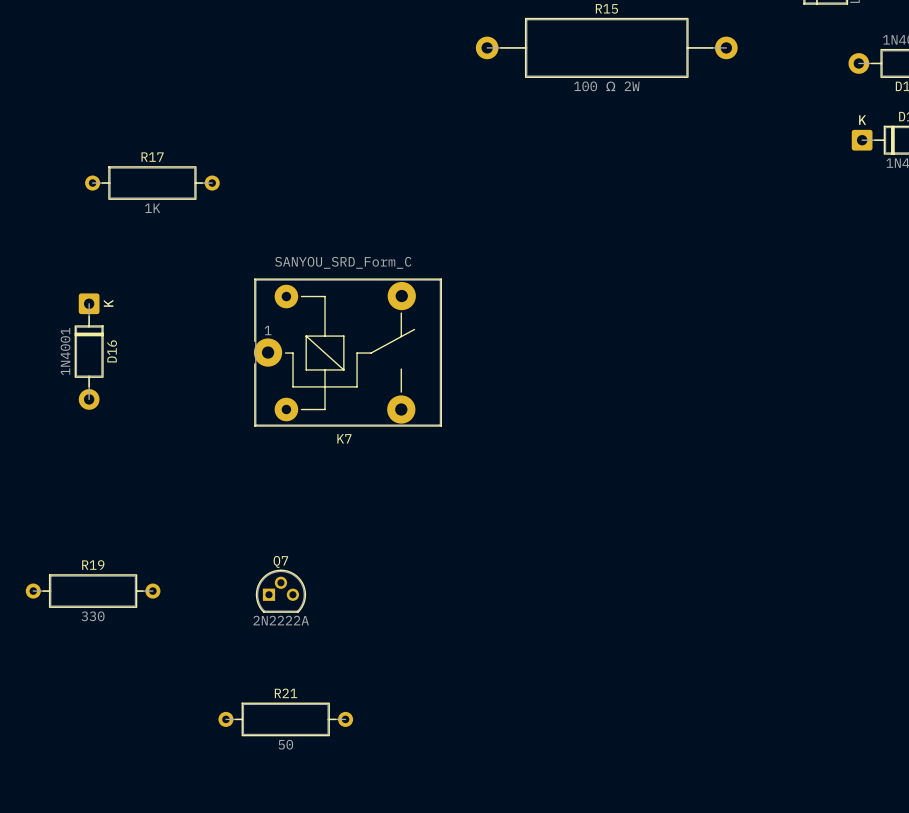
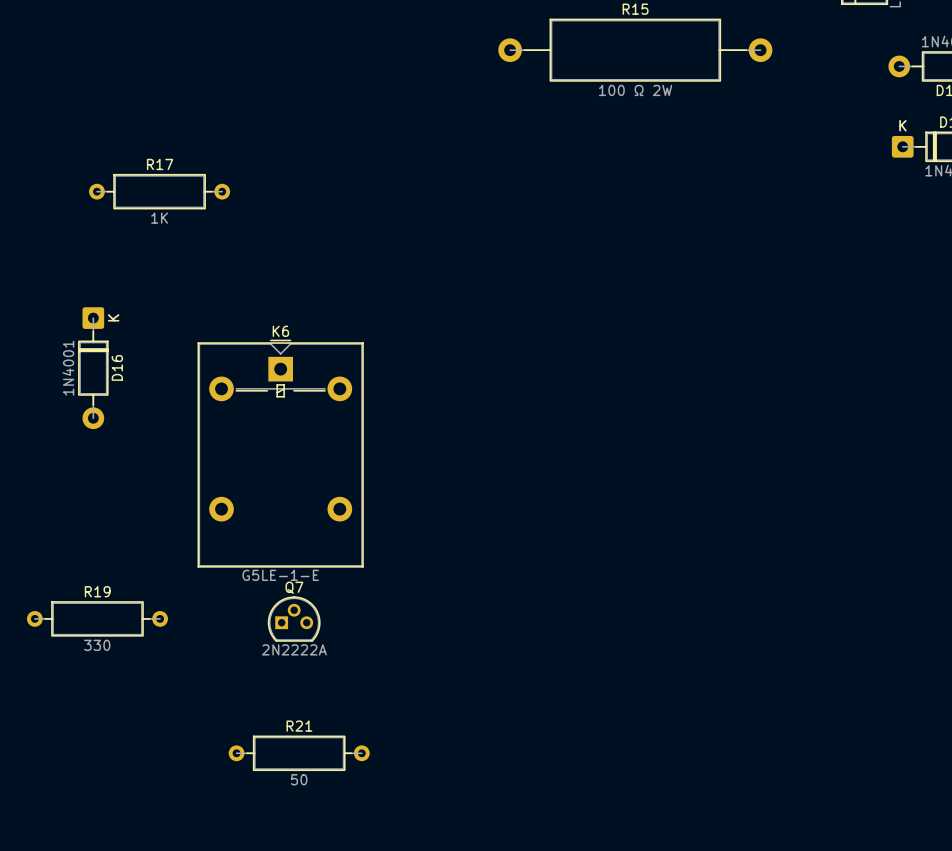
K7: SANYOU_SRD_Form_C (347, 352) -> none
K6: none -> G5LE-1-E (280, 453)

